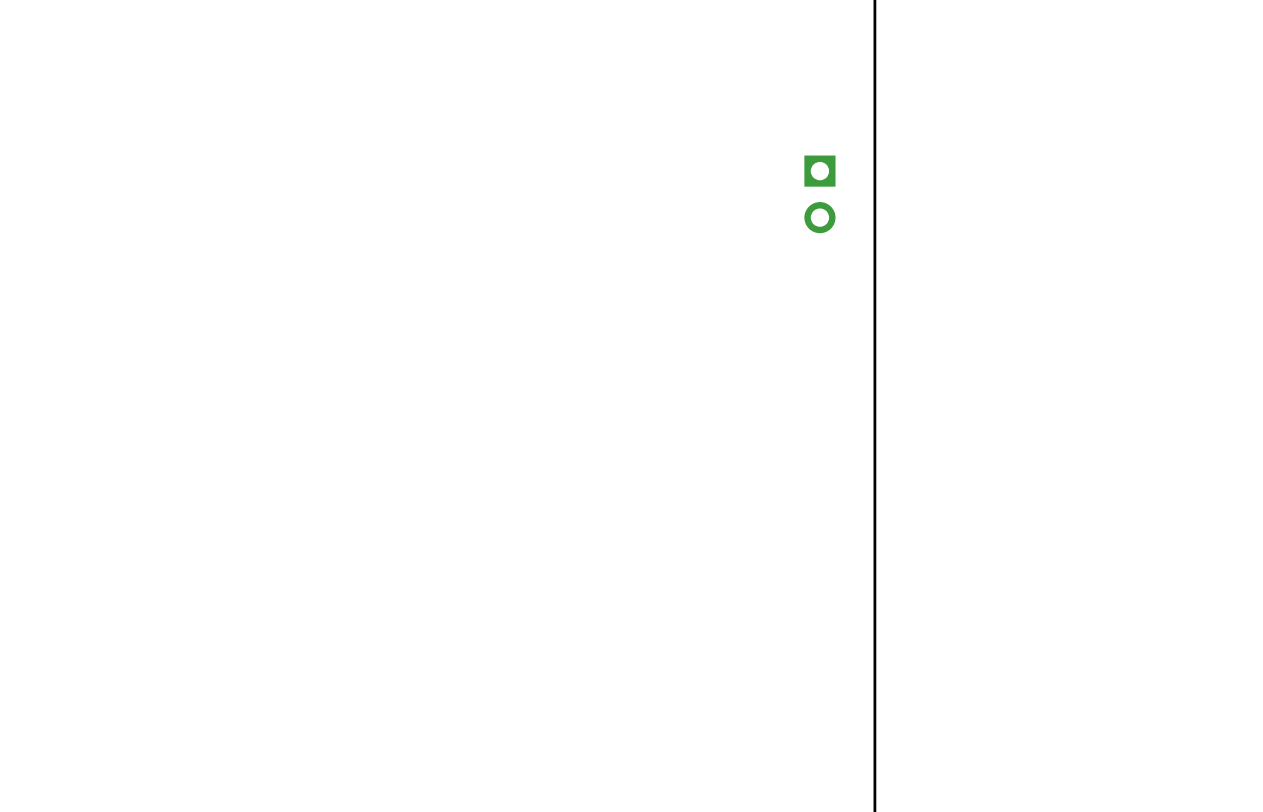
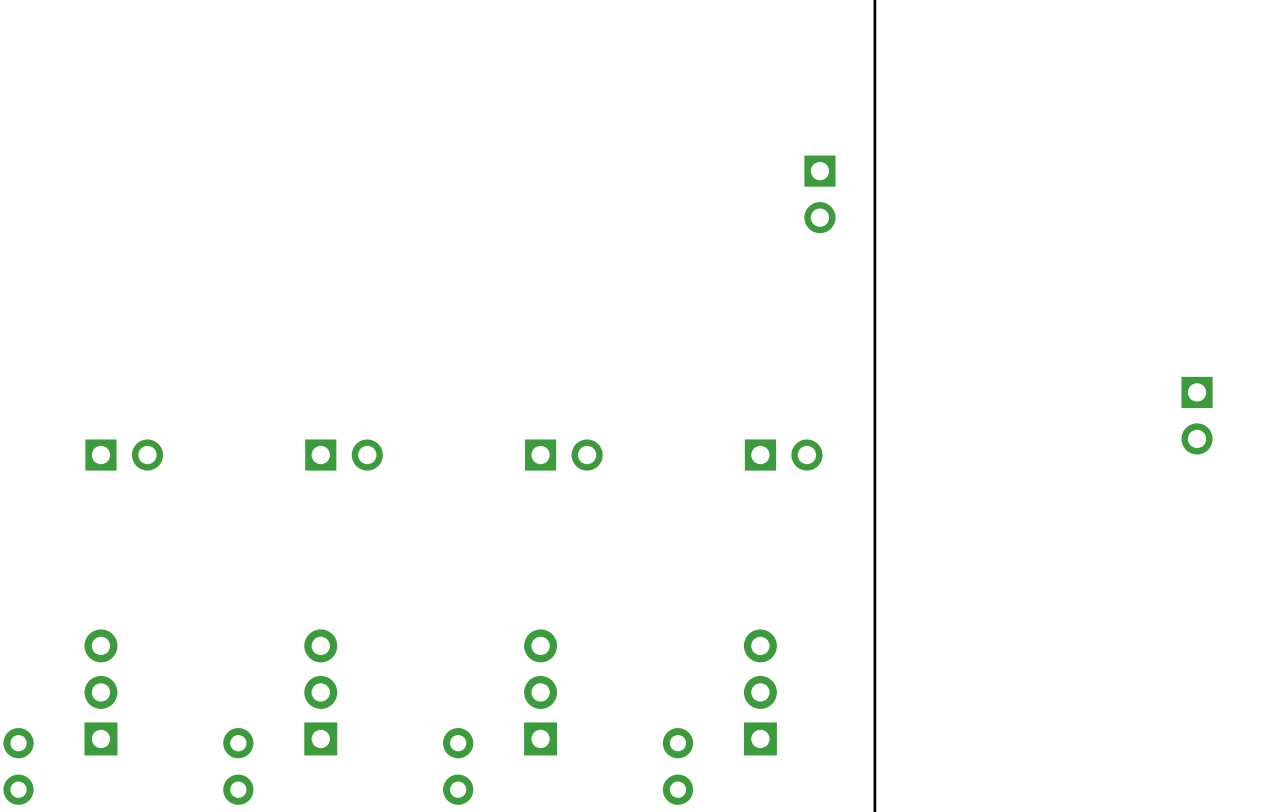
part: none -> (1197, 415)
part: none -> (124, 455)
part: none -> (344, 455)
part: none -> (563, 455)
part: none -> (783, 455)
part: none -> (100, 692)
part: none -> (320, 692)
part: none -> (540, 692)
part: none -> (760, 692)
part: none -> (18, 766)
part: none -> (238, 766)
part: none -> (458, 766)
part: none -> (677, 766)

